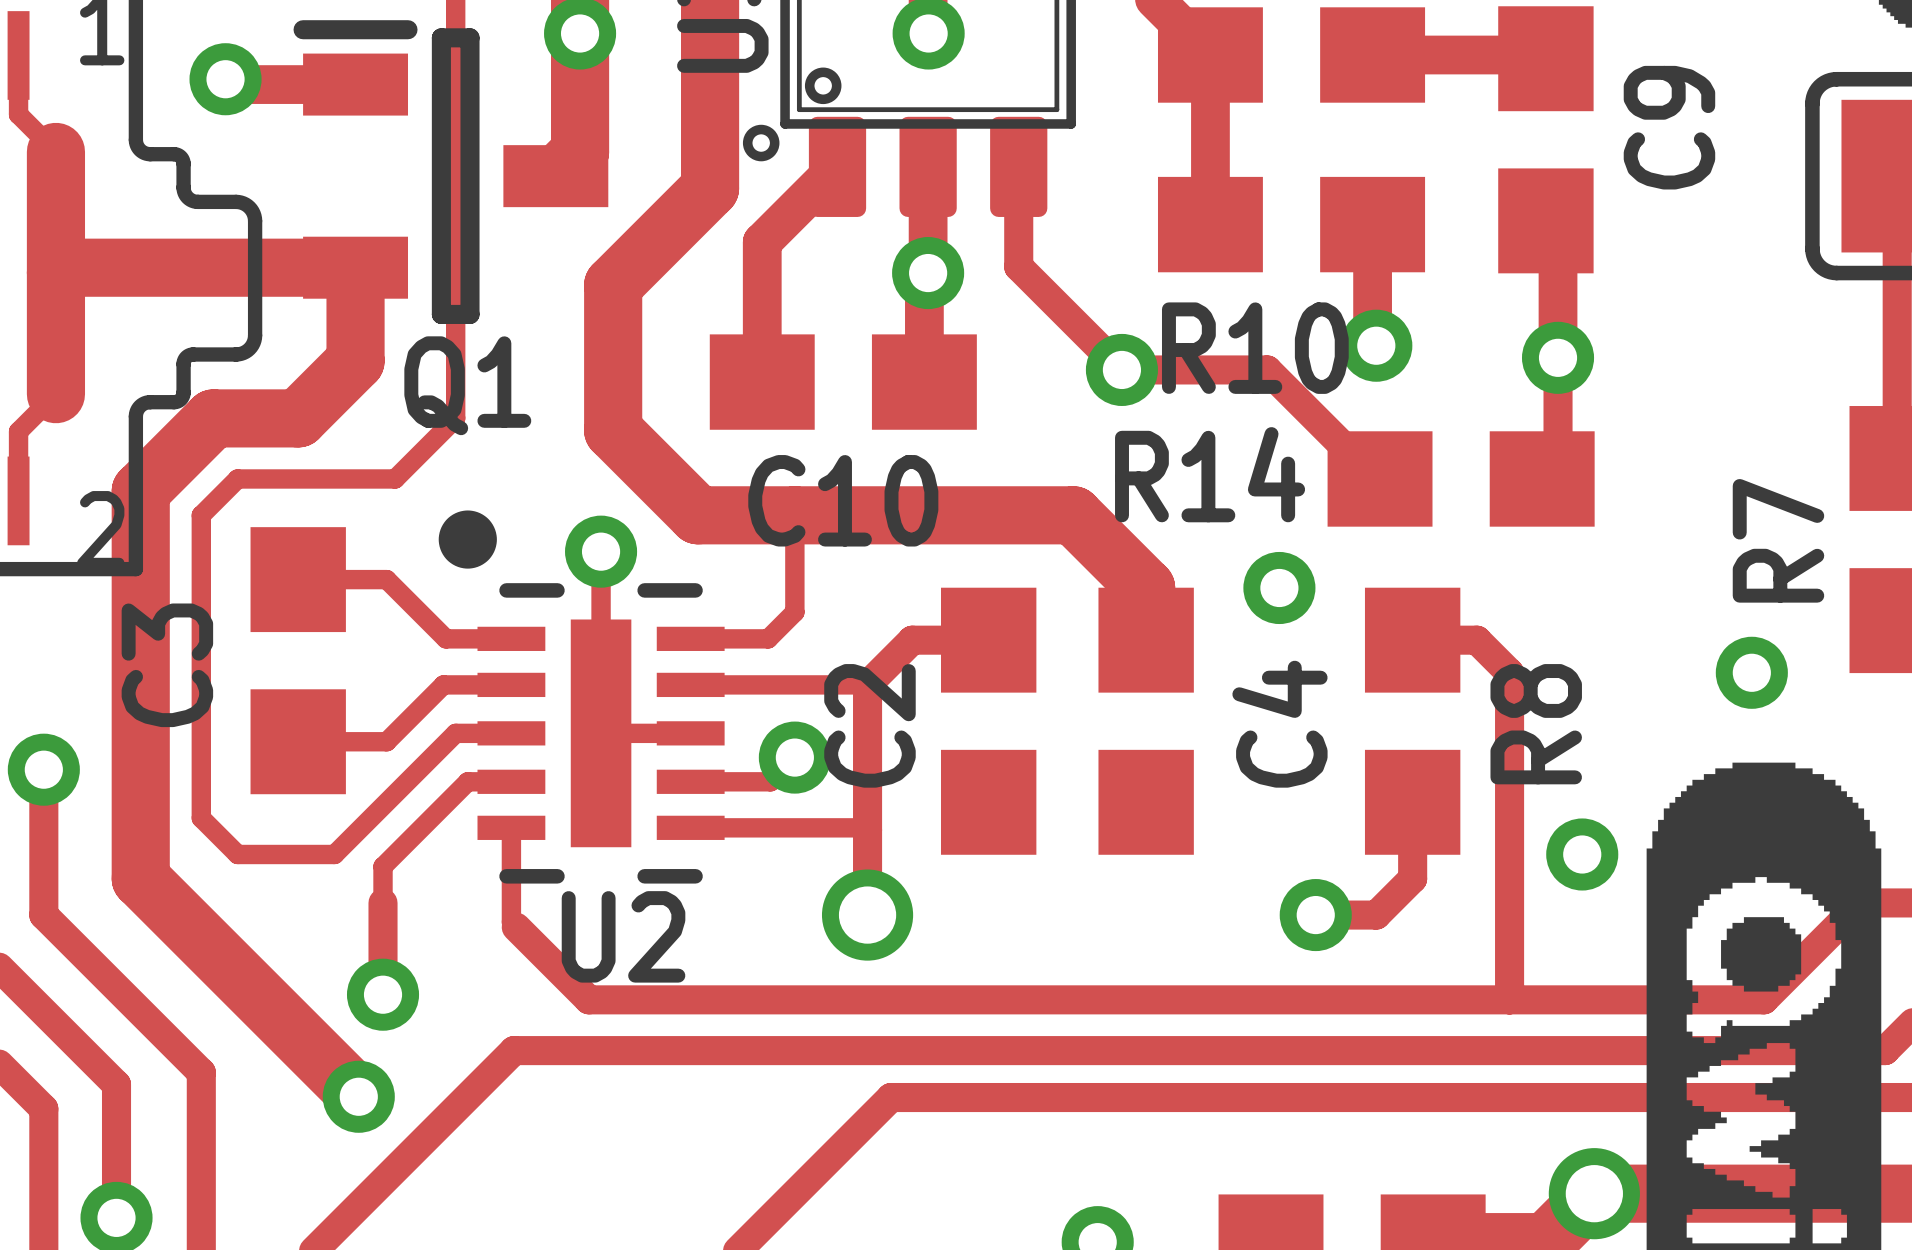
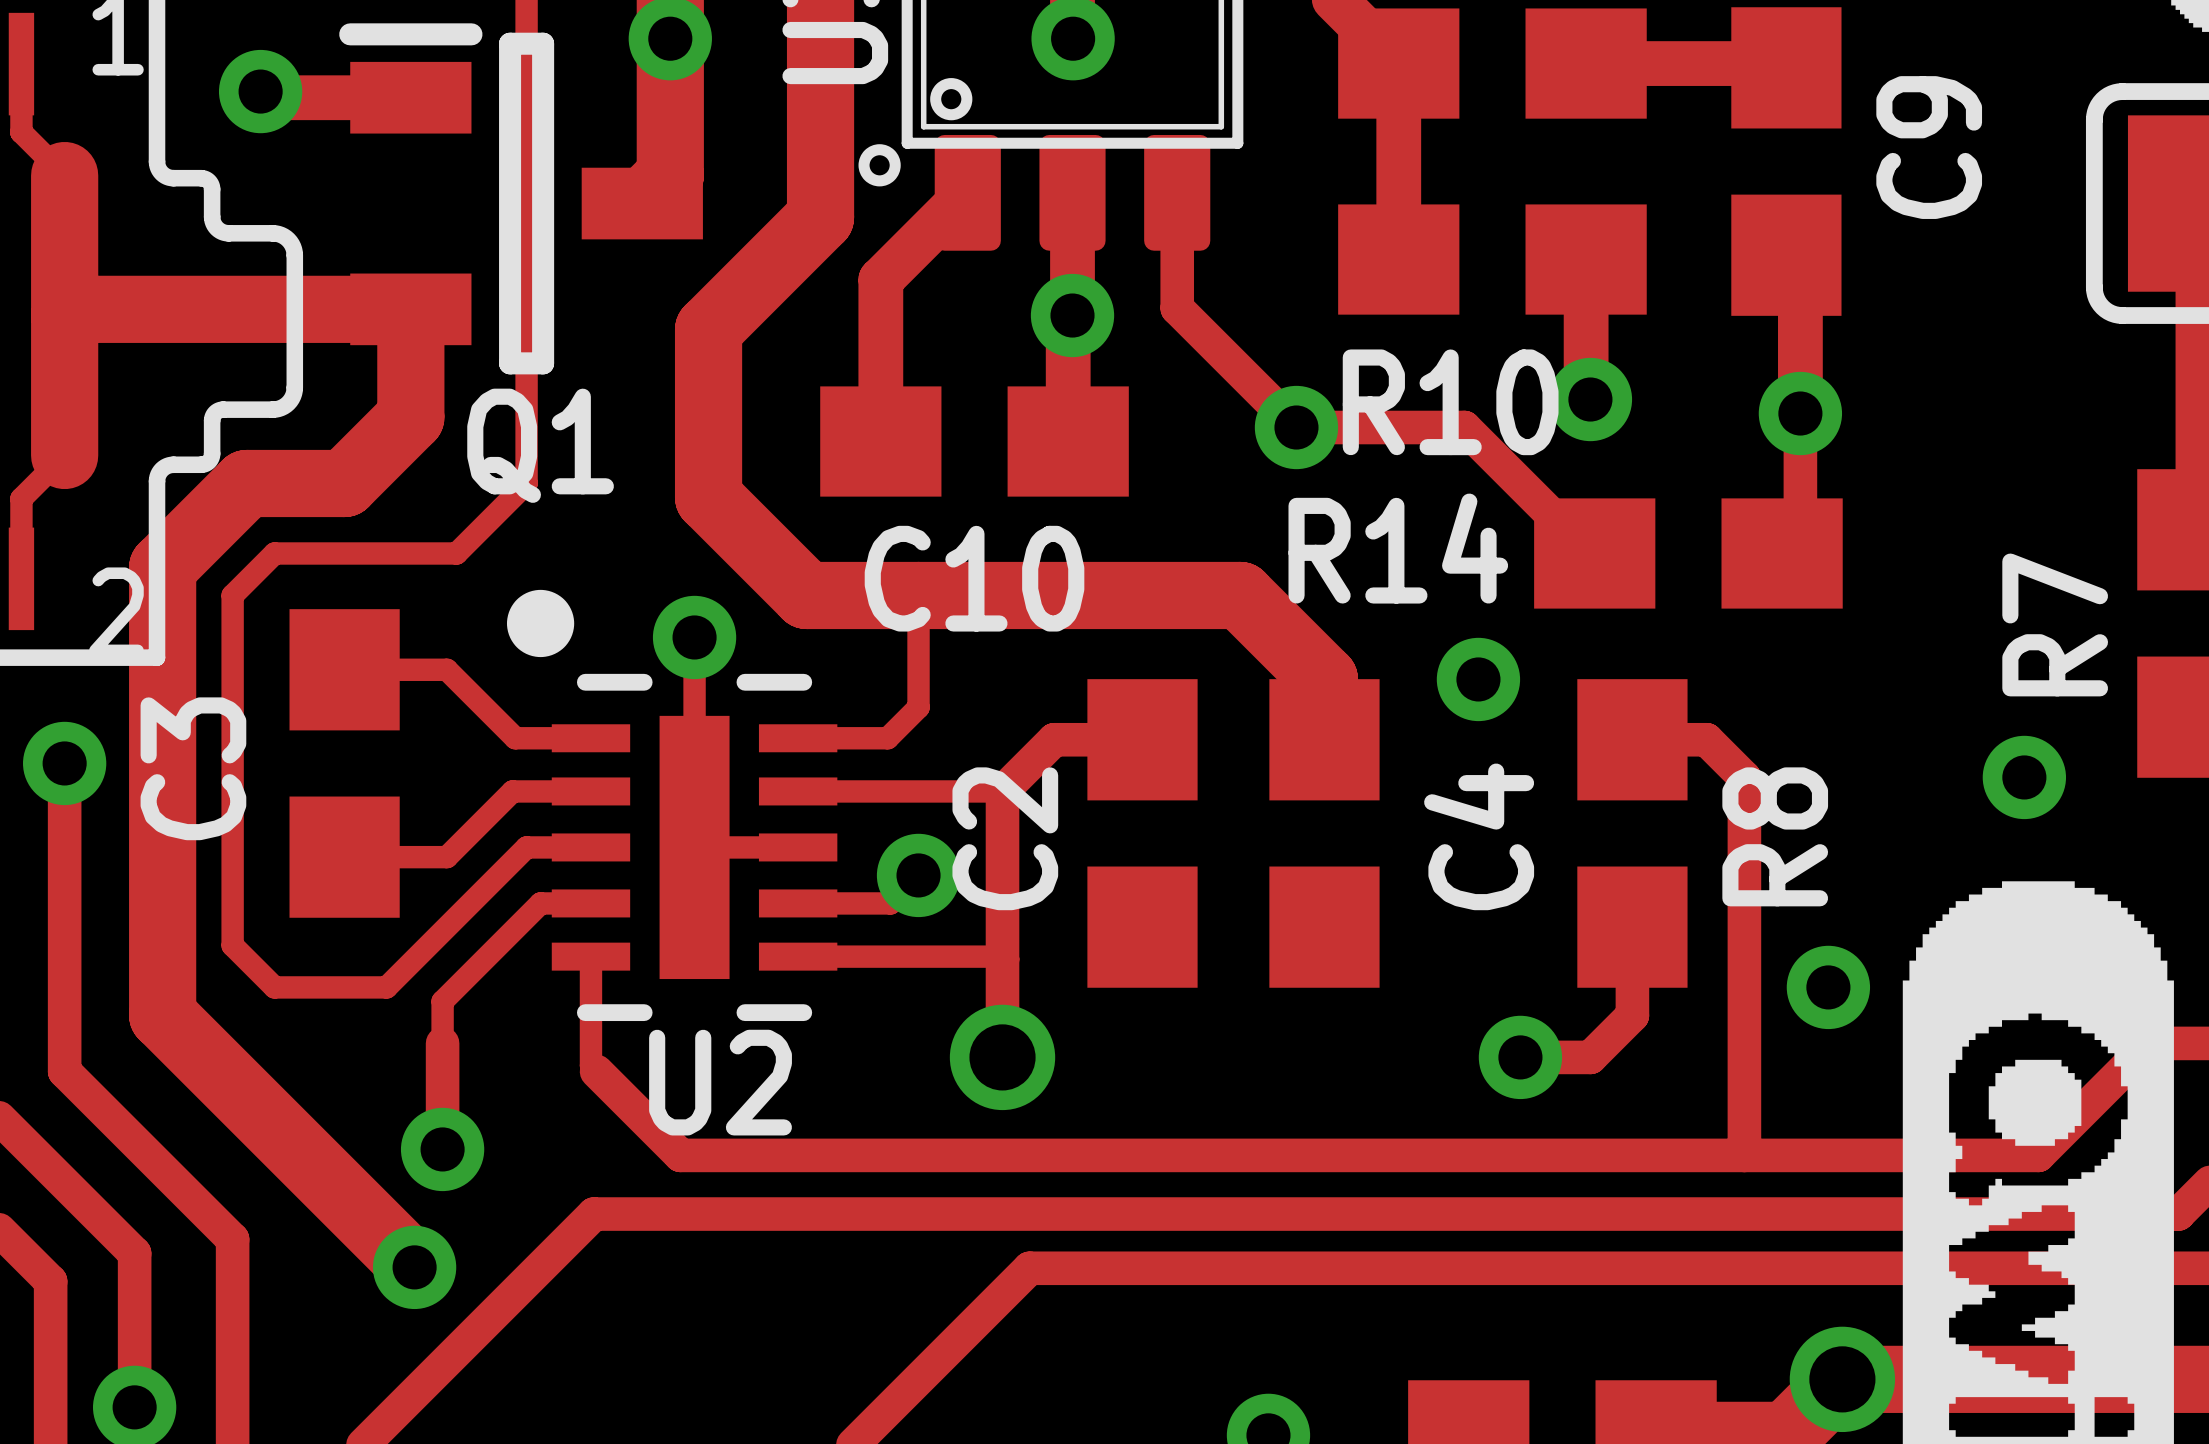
via: none -> (64, 763)
track: (43, 769) (43, 915) (55, 927) -> (64, 763) (64, 1071)
via: (43, 769) -> none

